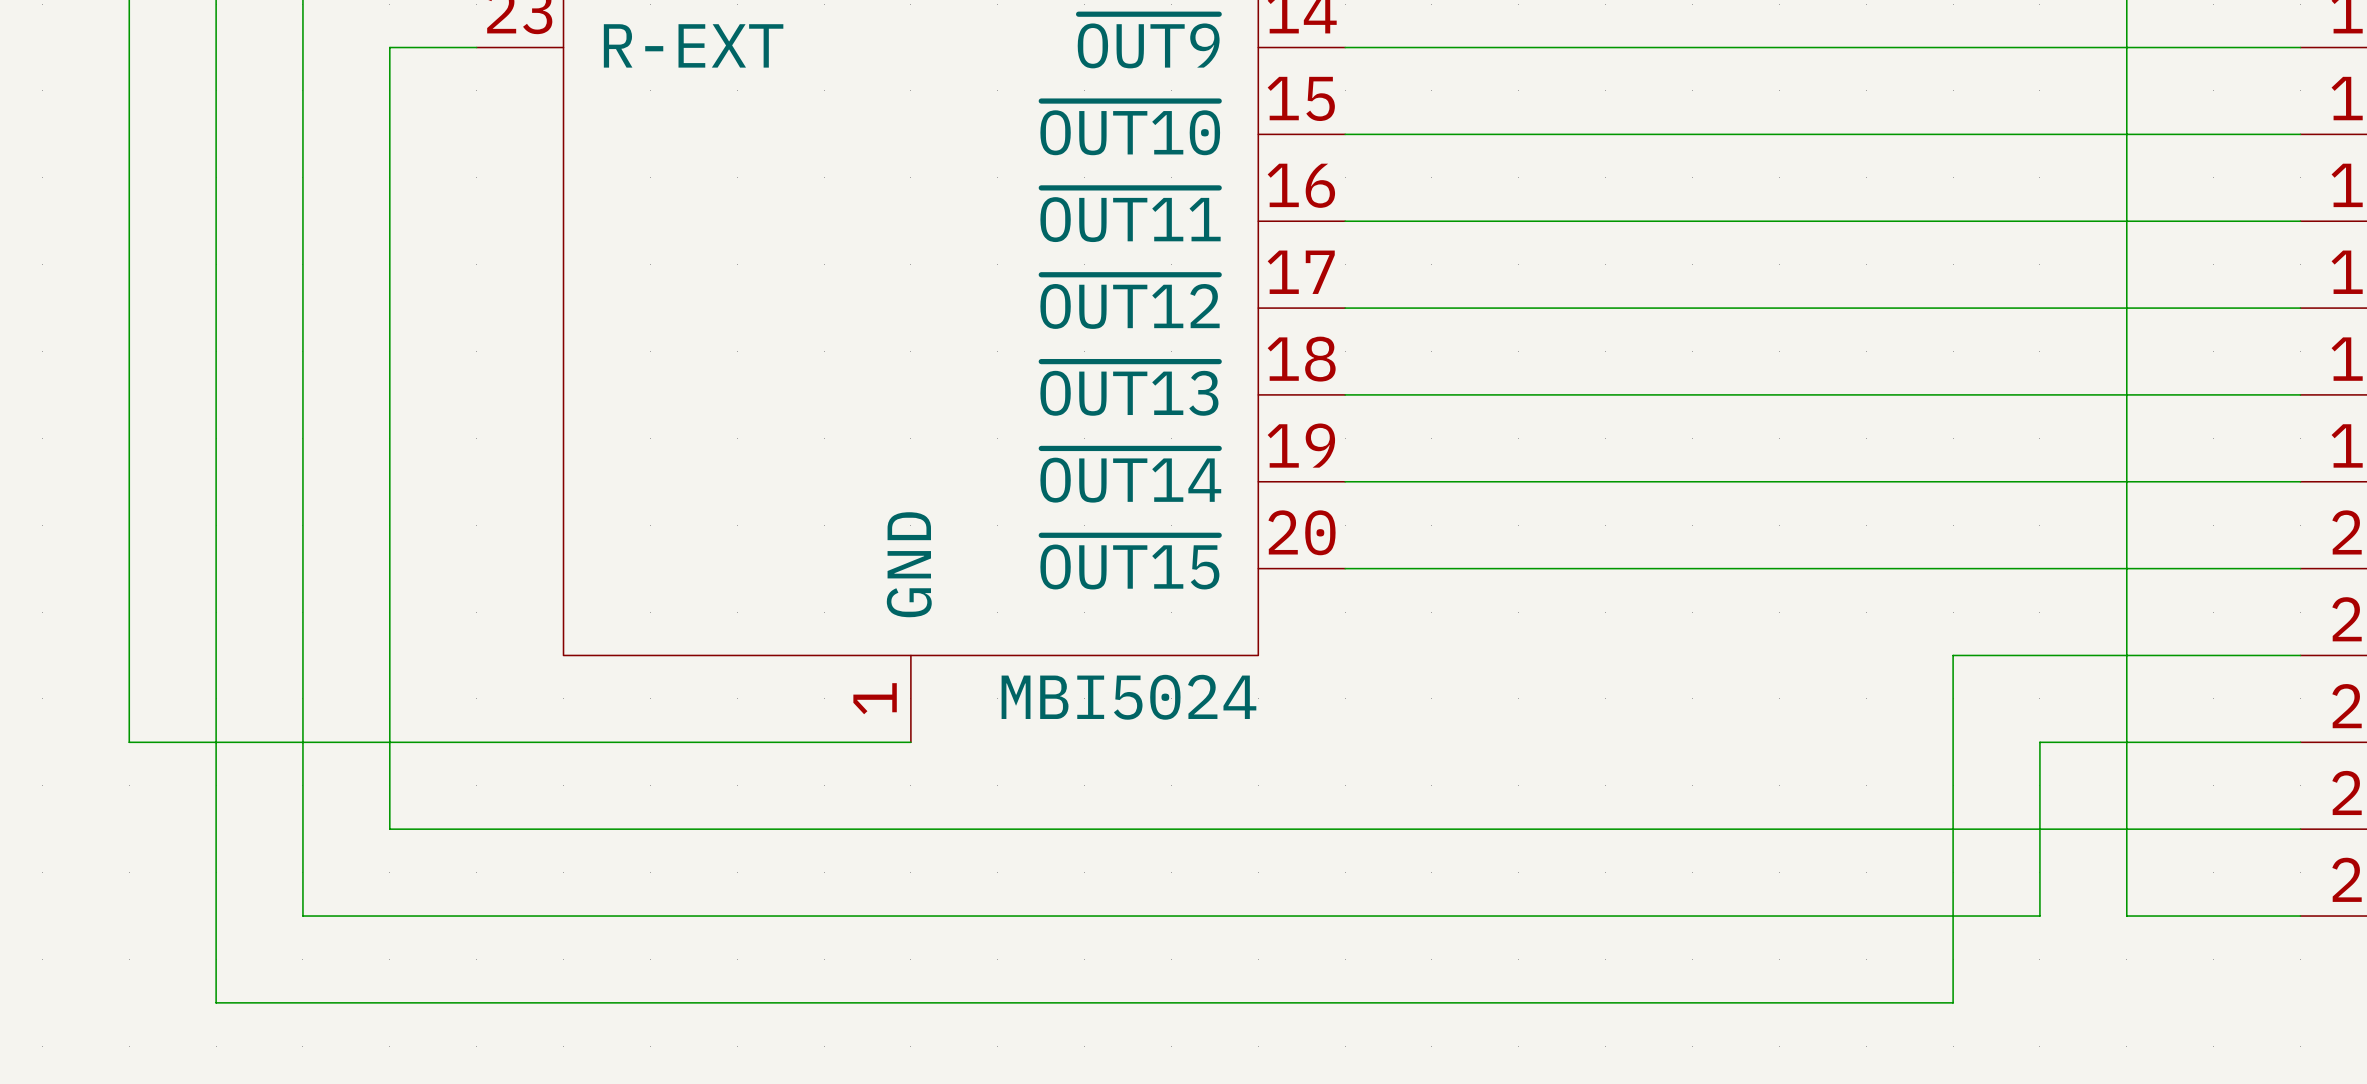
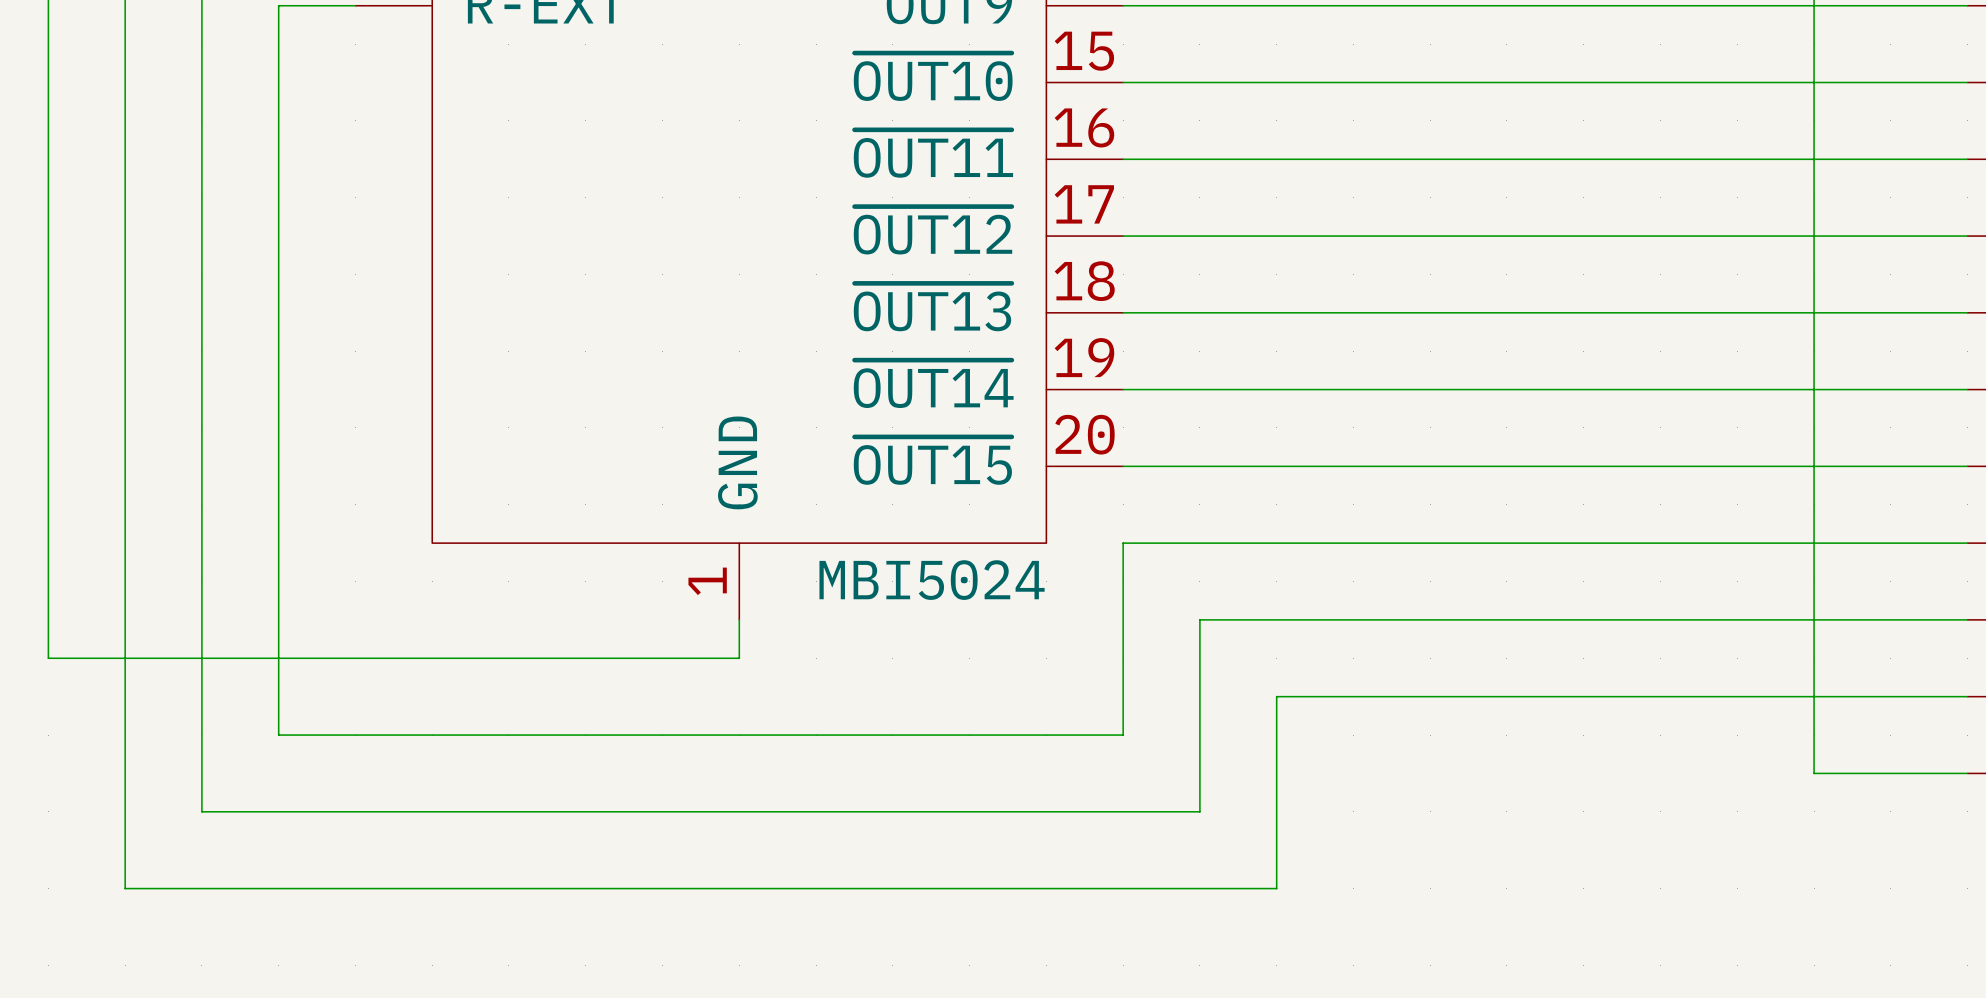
wire: (1953, 655) (1953, 1002) (216, 1002) -> (1660, 543) (1123, 543) (1123, 735) (278, 735) (278, 696)
wire: (129, 742) (910, 742) -> (48, 619) (48, 658) (739, 658) (739, 619)
wire: (2039, 742) (2039, 916) (302, 916) -> (1737, 619) (1199, 619) (1199, 811) (201, 811) (201, 773)
wire: (389, 829) (1518, 829) -> (125, 850) (125, 888) (1276, 888) (1276, 696)

